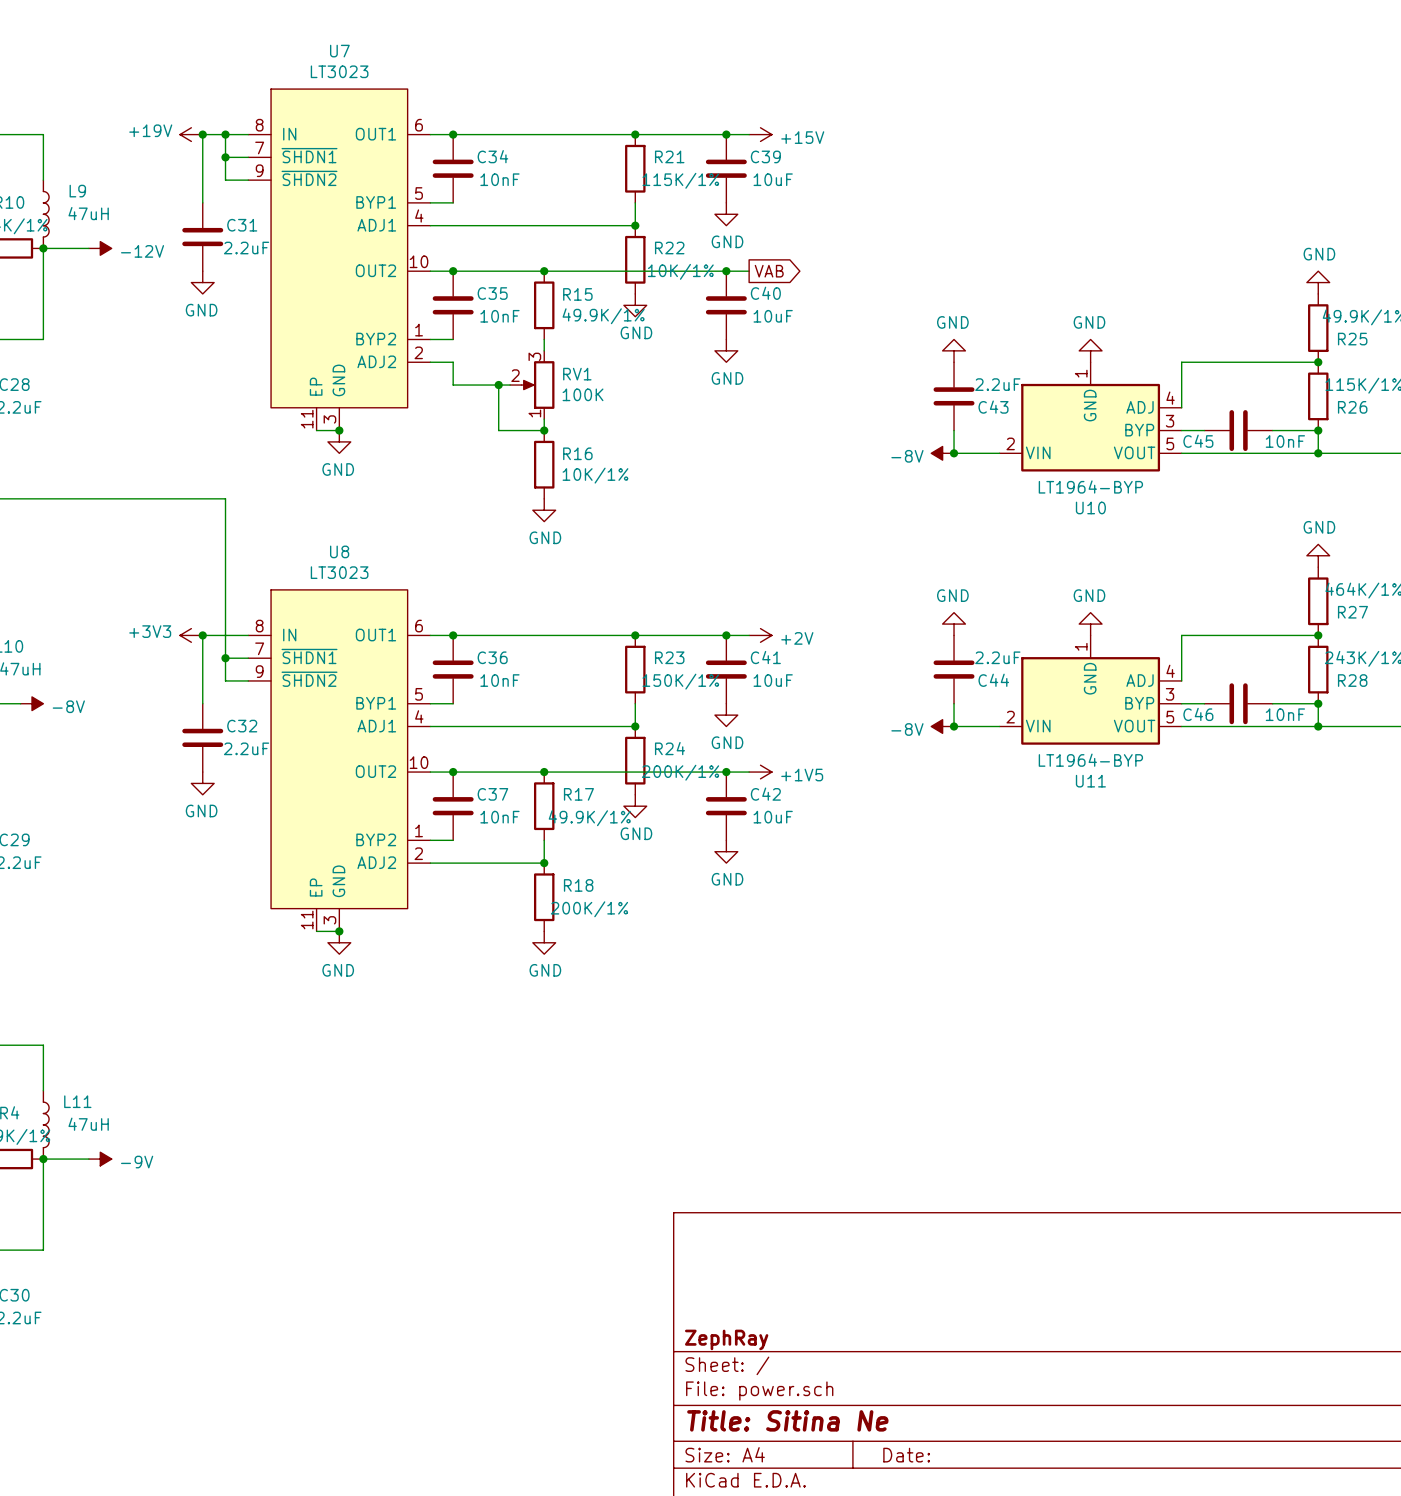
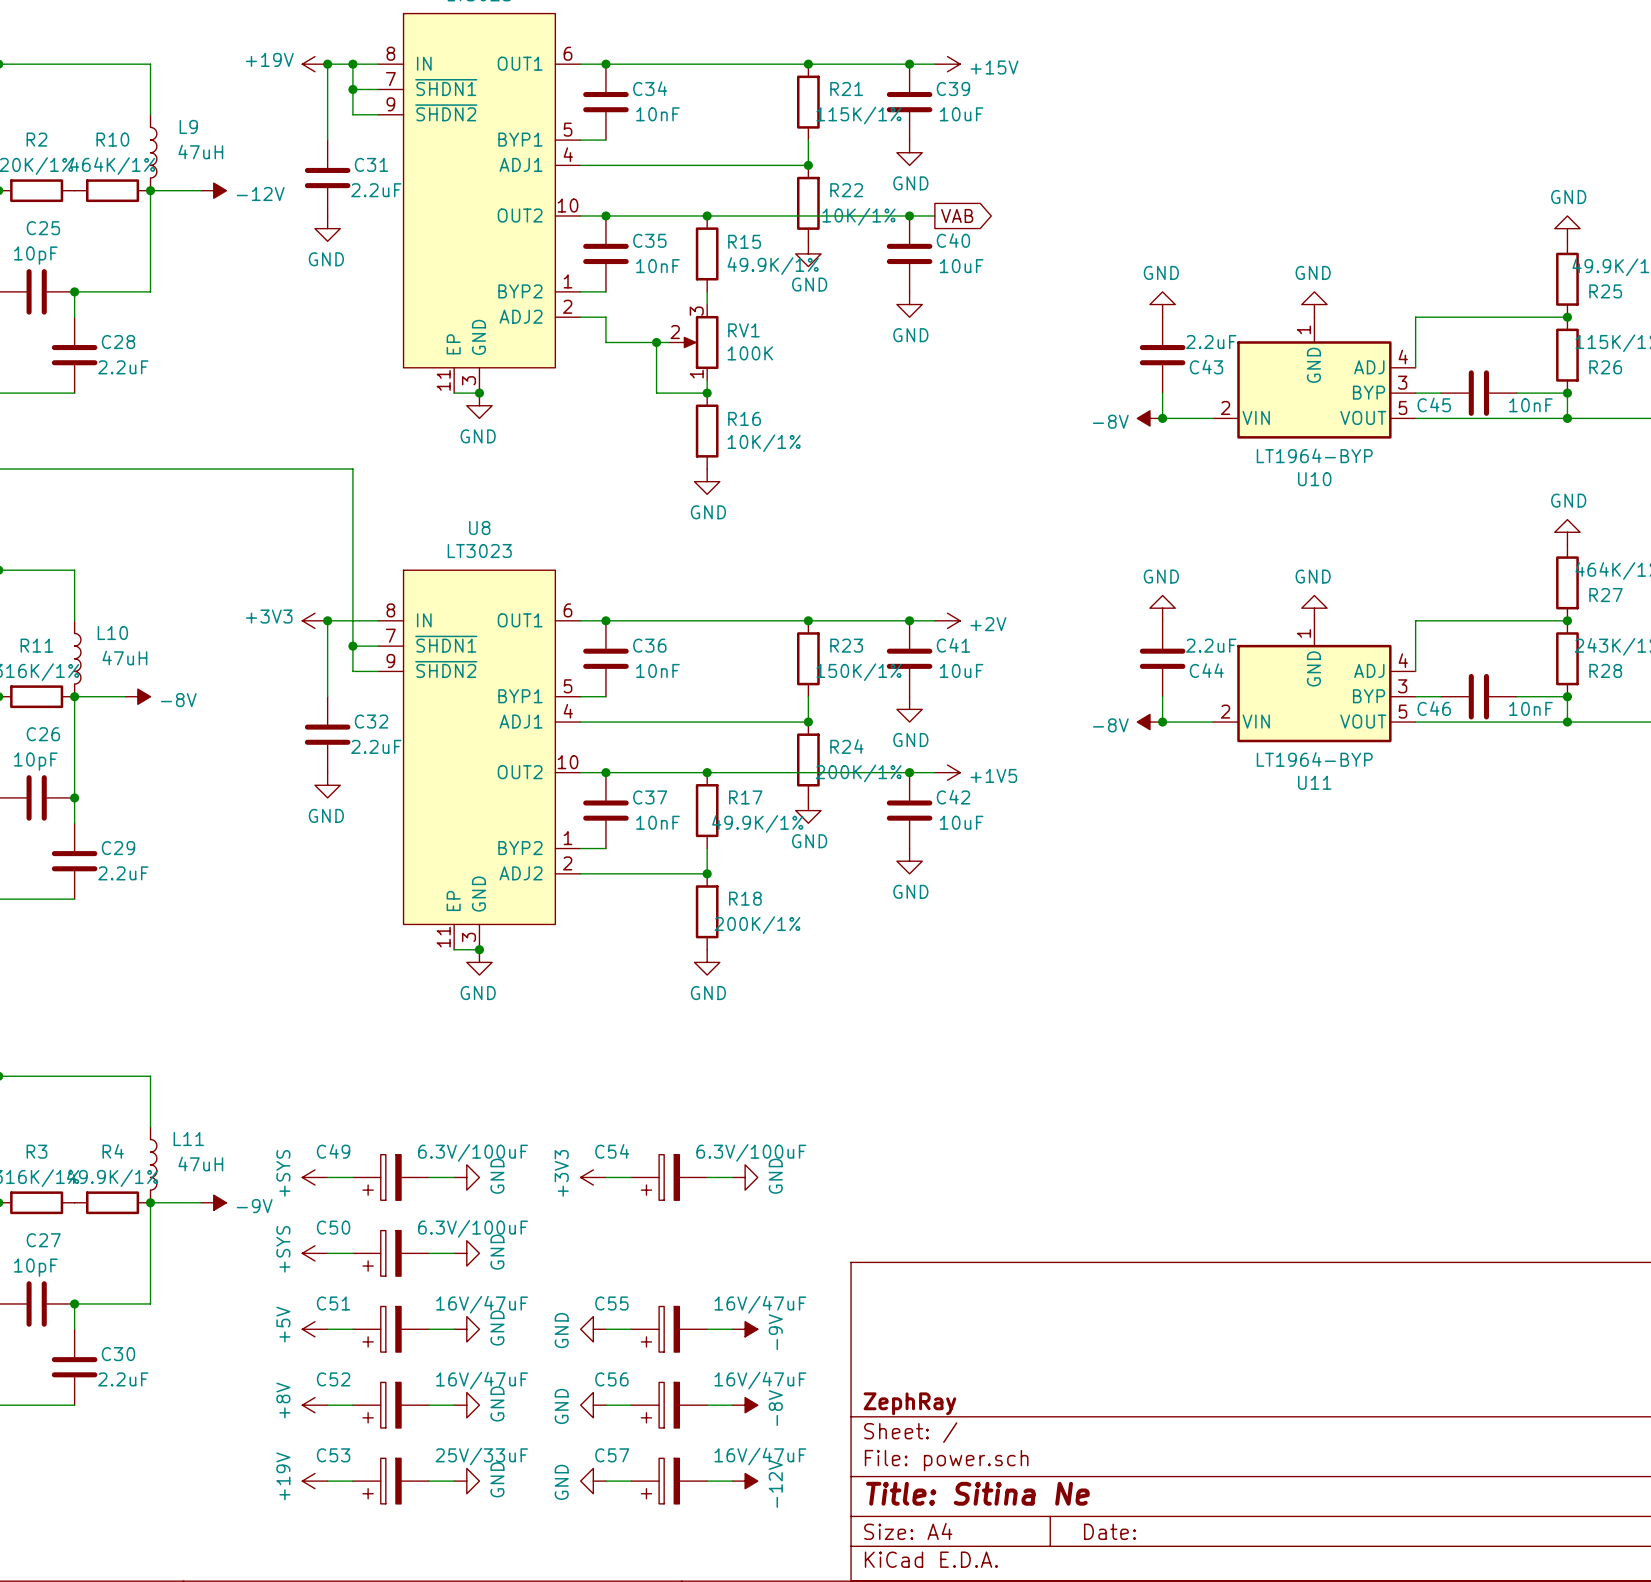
power symbol: none -> +SYS (314, 1177)
wire: none -> (327, 1177) (352, 1177)
C49: none -> 6.3V/100uF (390, 1177)
wire: none -> (428, 1177) (454, 1177)
power symbol: none -> GND (466, 1177)
power symbol: none -> +3V3 (593, 1177)
wire: none -> (605, 1177) (631, 1177)
C54: none -> 6.3V/100uF (669, 1177)
wire: none -> (707, 1177) (732, 1177)
power symbol: none -> GND (745, 1177)
power symbol: none -> +SYS (314, 1253)
wire: none -> (327, 1253) (352, 1253)
C50: none -> 6.3V/100uF (390, 1253)
wire: none -> (428, 1253) (454, 1253)
power symbol: none -> GND (466, 1253)
power symbol: none -> +5V (314, 1329)
wire: none -> (327, 1329) (352, 1329)
C51: none -> 16V/47uF (390, 1329)
wire: none -> (428, 1329) (454, 1329)
power symbol: none -> GND (466, 1329)
power symbol: none -> GND (593, 1329)
wire: none -> (605, 1329) (631, 1329)
C55: none -> 16V/47uF (669, 1329)
wire: none -> (707, 1329) (732, 1329)
power symbol: none -> -9V (745, 1329)
power symbol: none -> +8V (314, 1405)
wire: none -> (327, 1405) (352, 1405)
C52: none -> 16V/47uF (390, 1405)
wire: none -> (428, 1405) (454, 1405)
power symbol: none -> GND (466, 1405)
power symbol: none -> GND (593, 1405)
wire: none -> (605, 1405) (631, 1405)
C56: none -> 16V/47uF (669, 1405)
wire: none -> (707, 1405) (732, 1405)
power symbol: none -> -8V (745, 1405)
power symbol: none -> +19V (314, 1481)
wire: none -> (327, 1481) (352, 1481)
C53: none -> 25V/33uF (390, 1481)
wire: none -> (428, 1481) (454, 1481)
power symbol: none -> GND (466, 1481)
power symbol: none -> GND (593, 1481)
wire: none -> (605, 1481) (631, 1481)
C57: none -> 16V/47uF (669, 1481)
wire: none -> (707, 1481) (732, 1481)
power symbol: none -> -12V (745, 1481)

